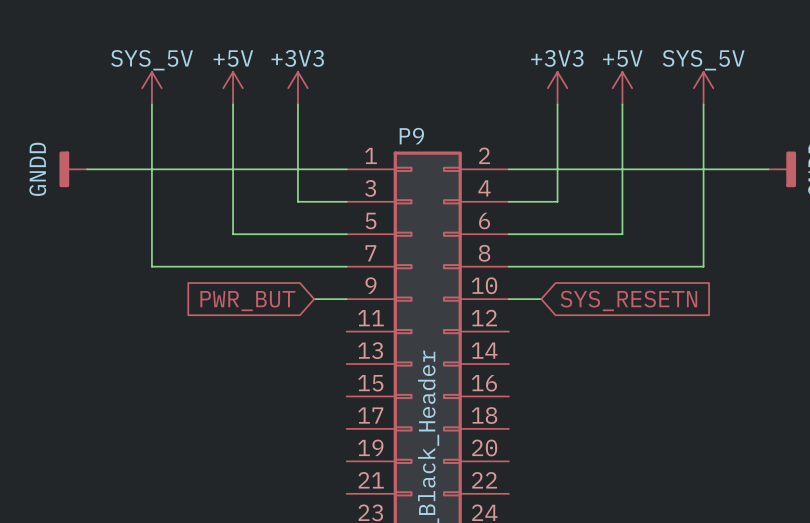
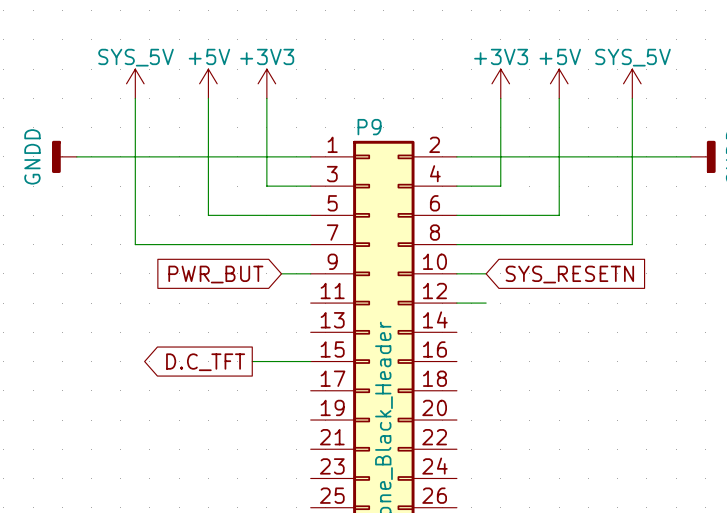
wire: none -> (456, 303) (486, 303)
wire: none -> (252, 361) (310, 361)
global label: none -> D.C_TFT (205, 362)

